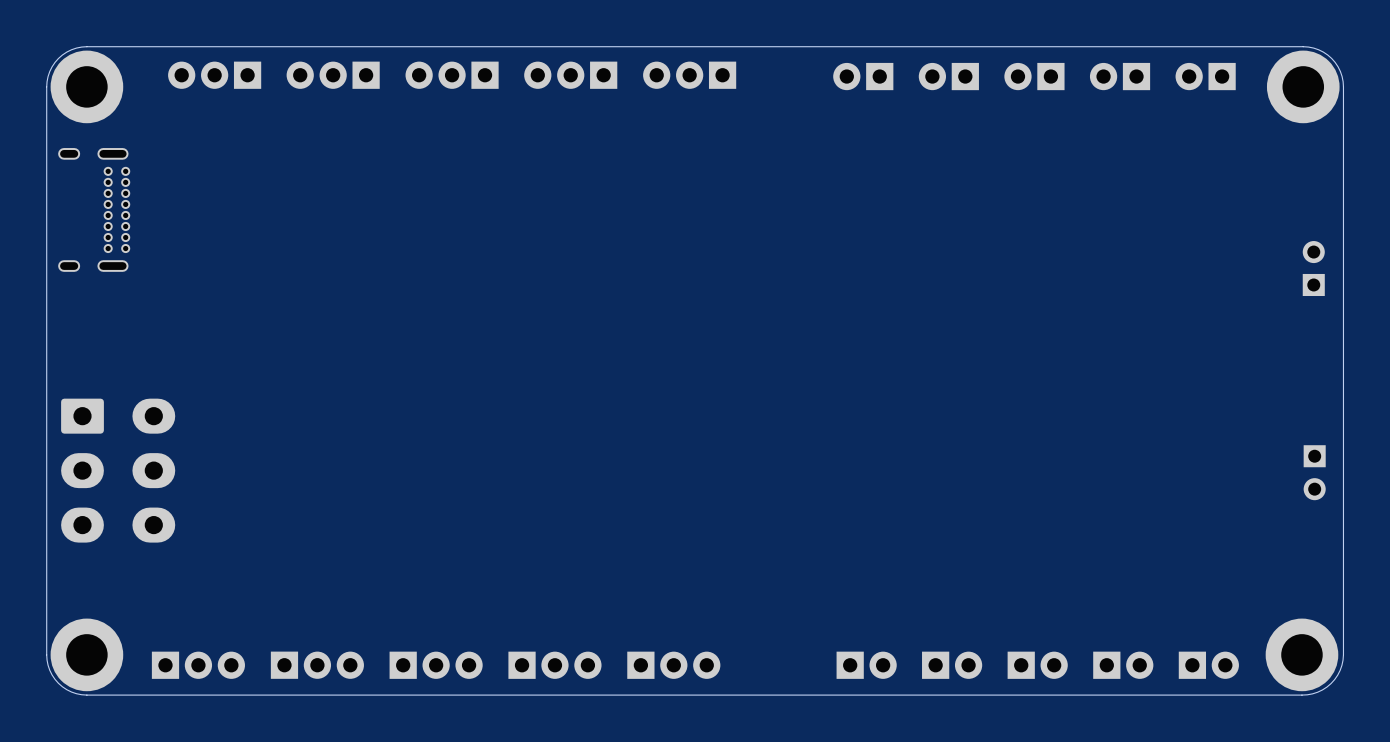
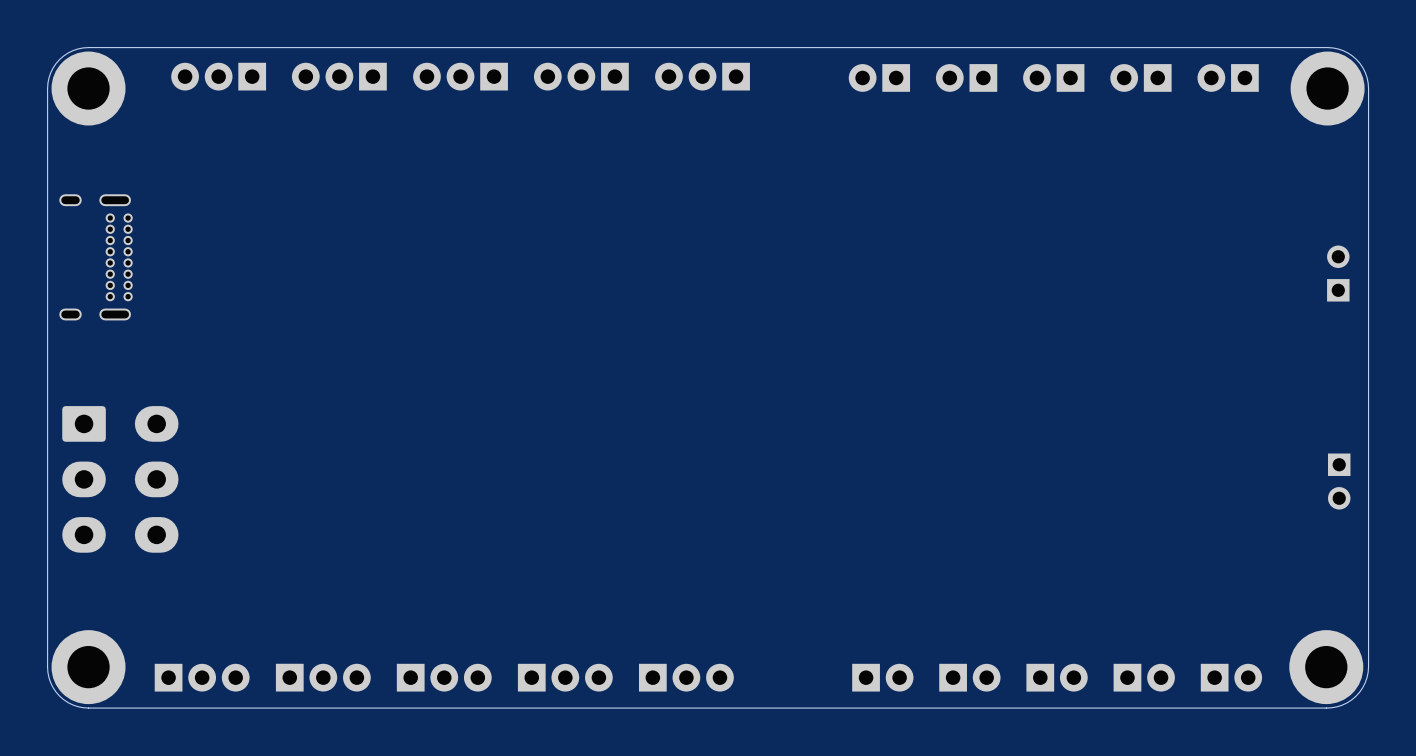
part position: (94, 209) -> (95, 257)

